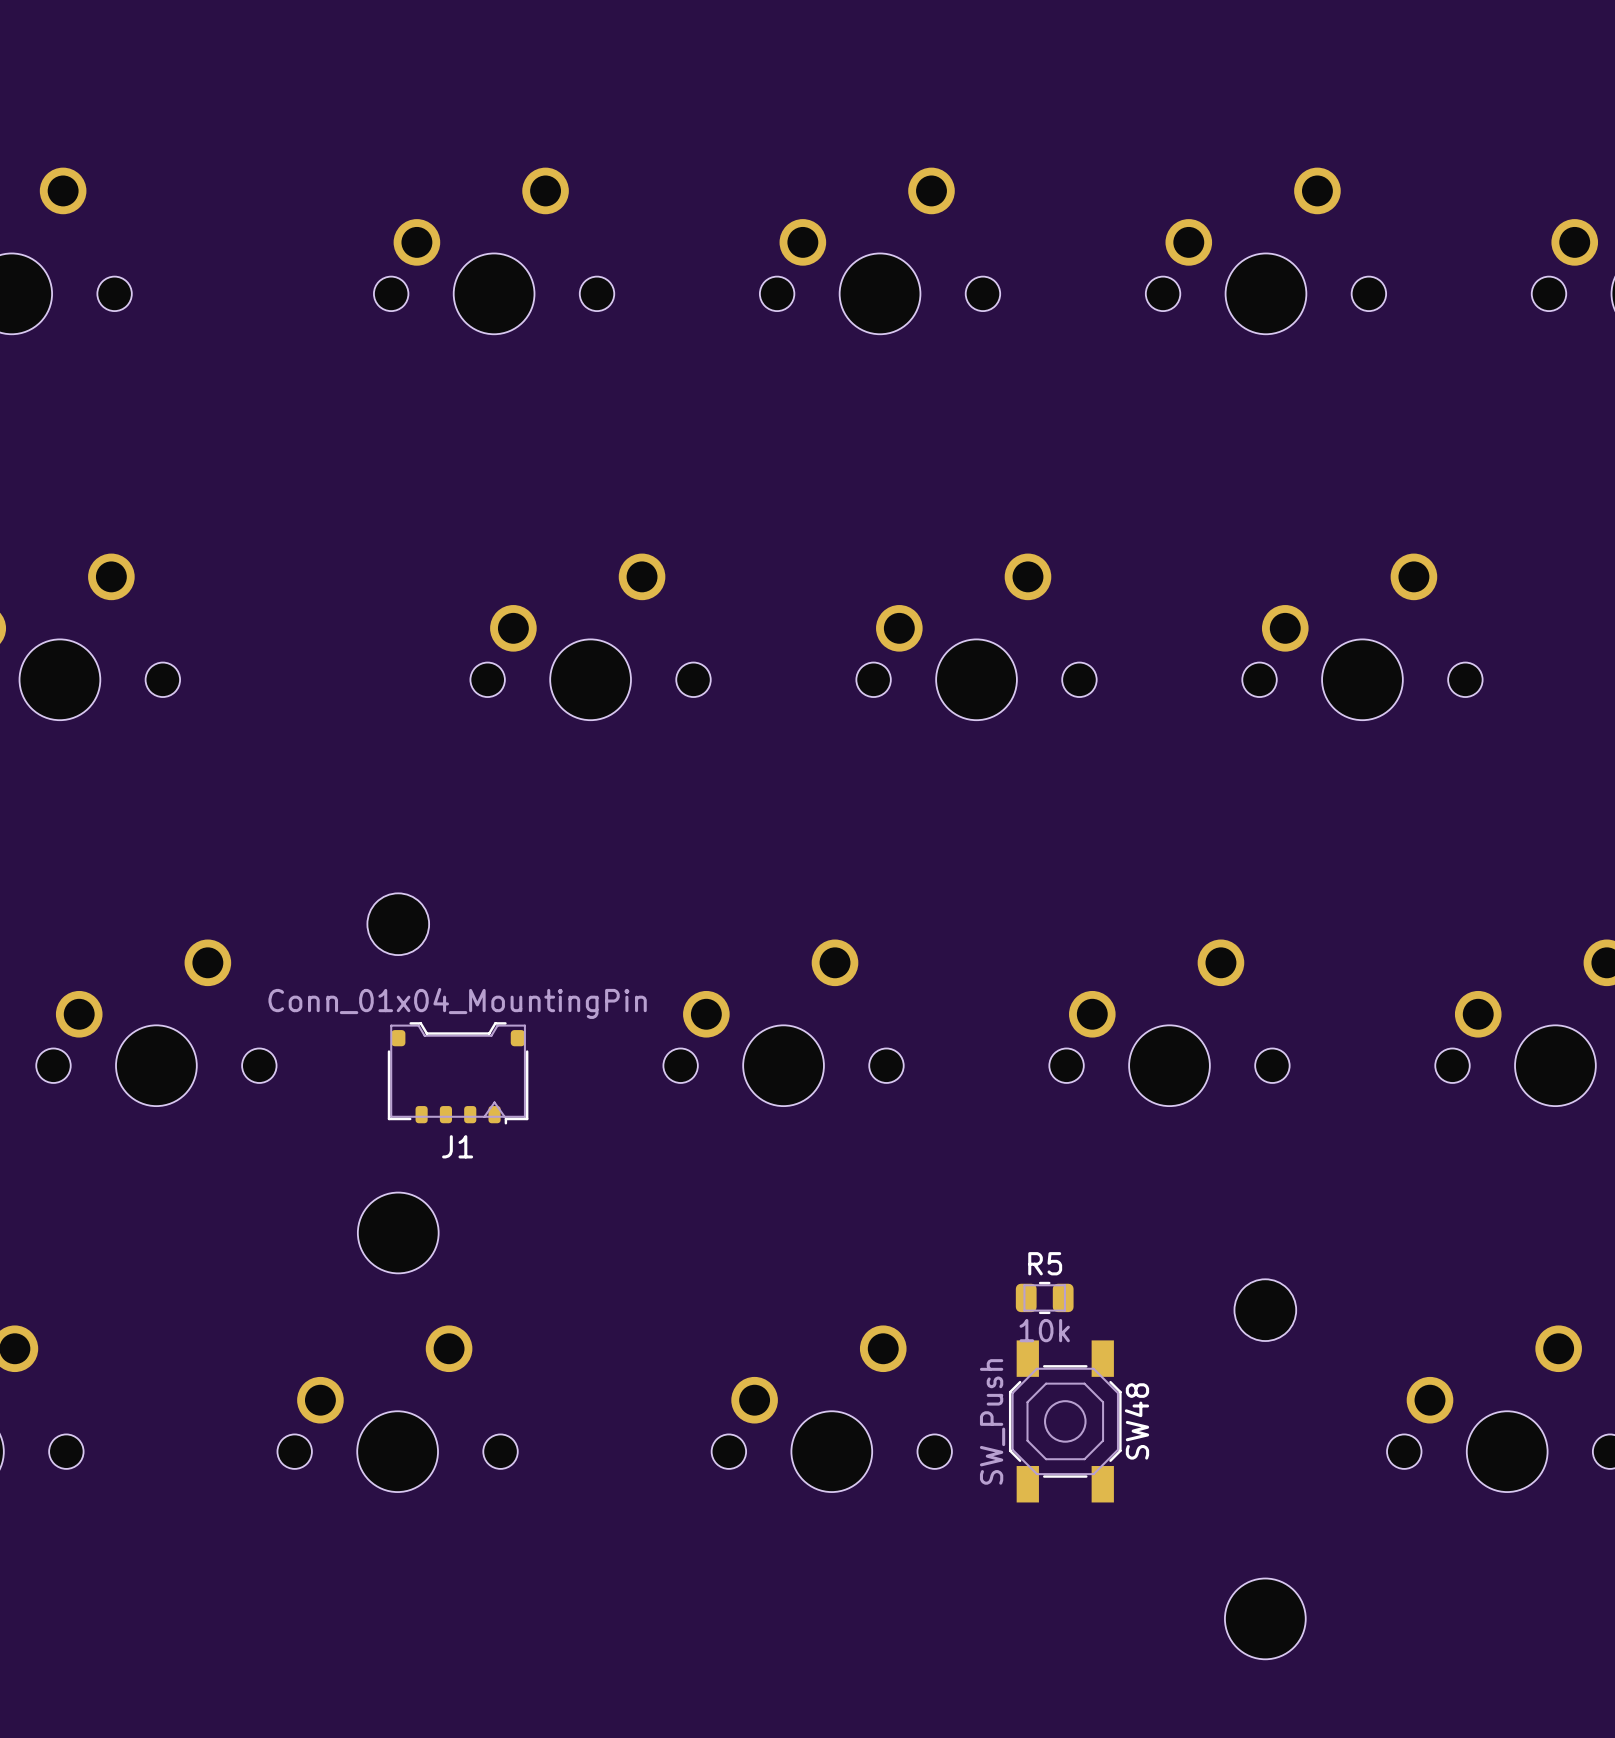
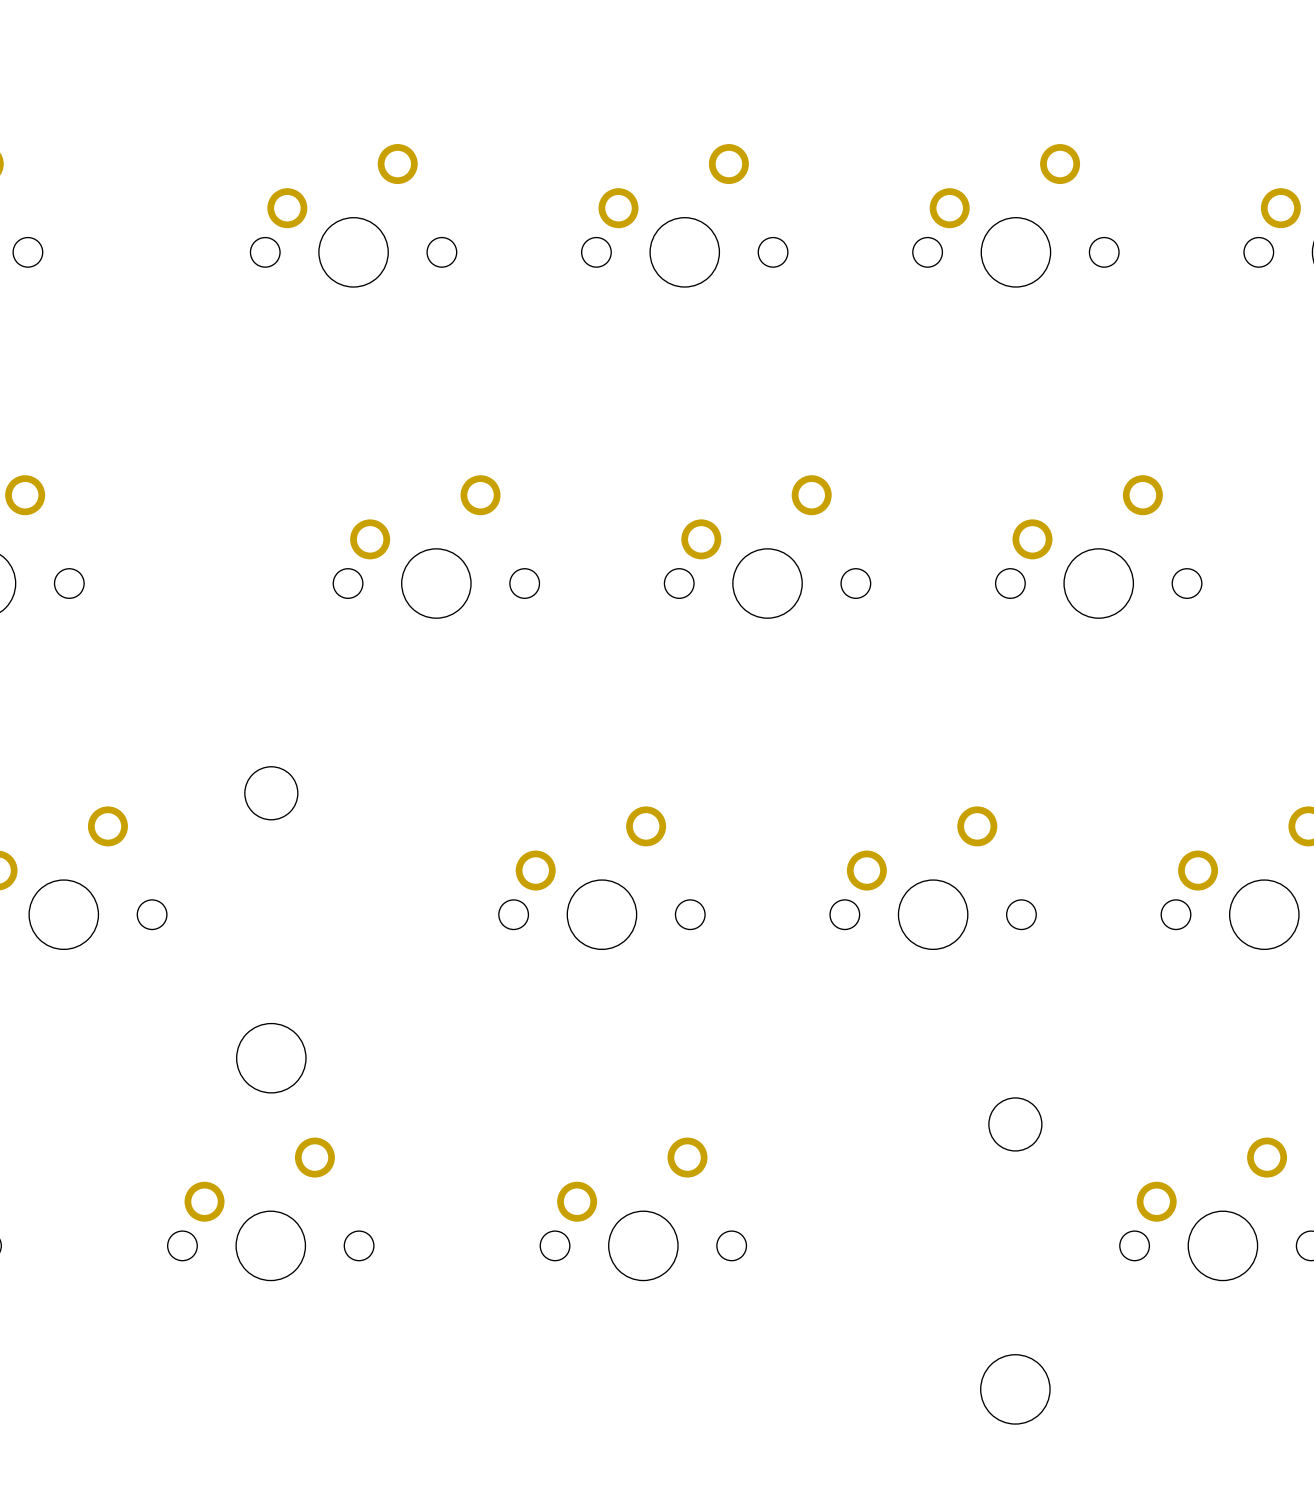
J1: Conn_01x04_MountingPin (458, 1073) -> none
R5: 10k (1044, 1297) -> none
SW48: SW_Push (1065, 1421) -> none

